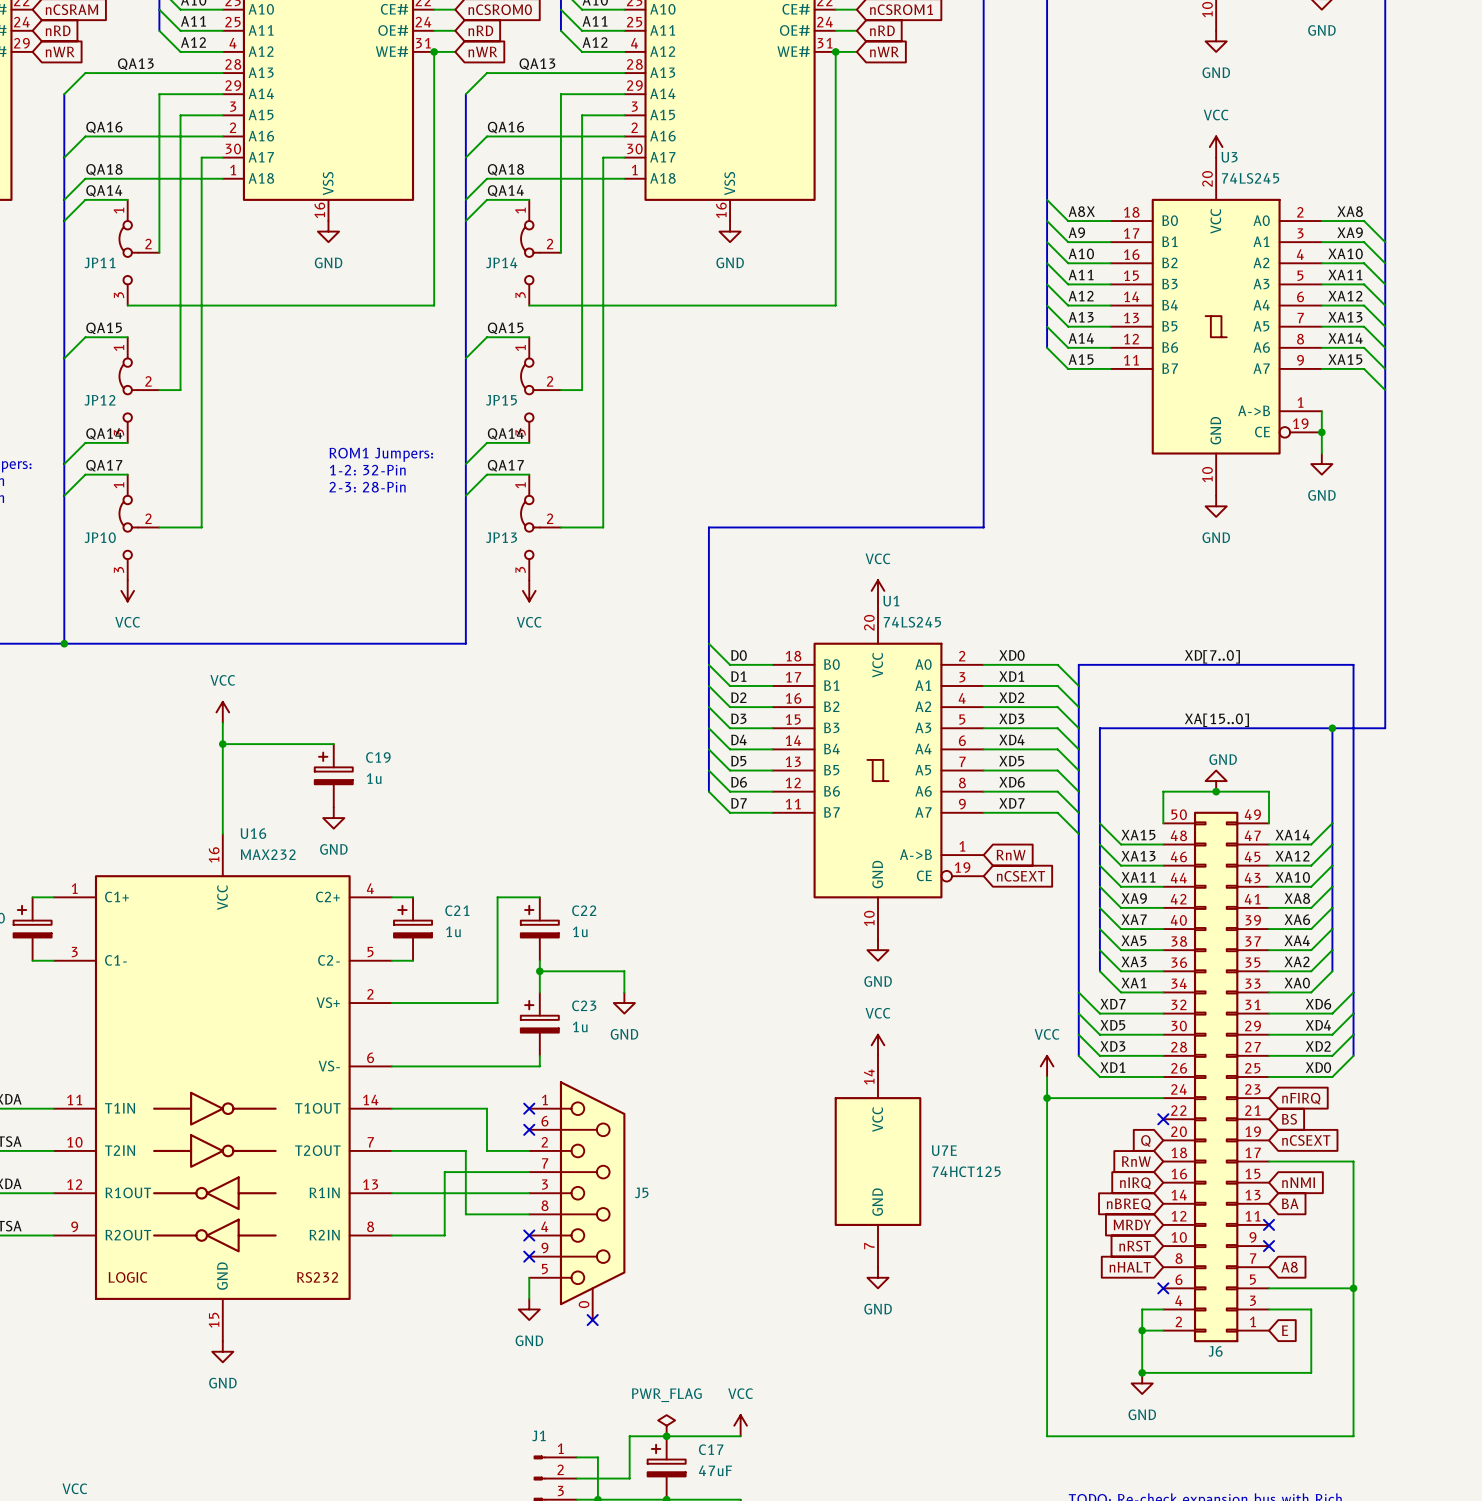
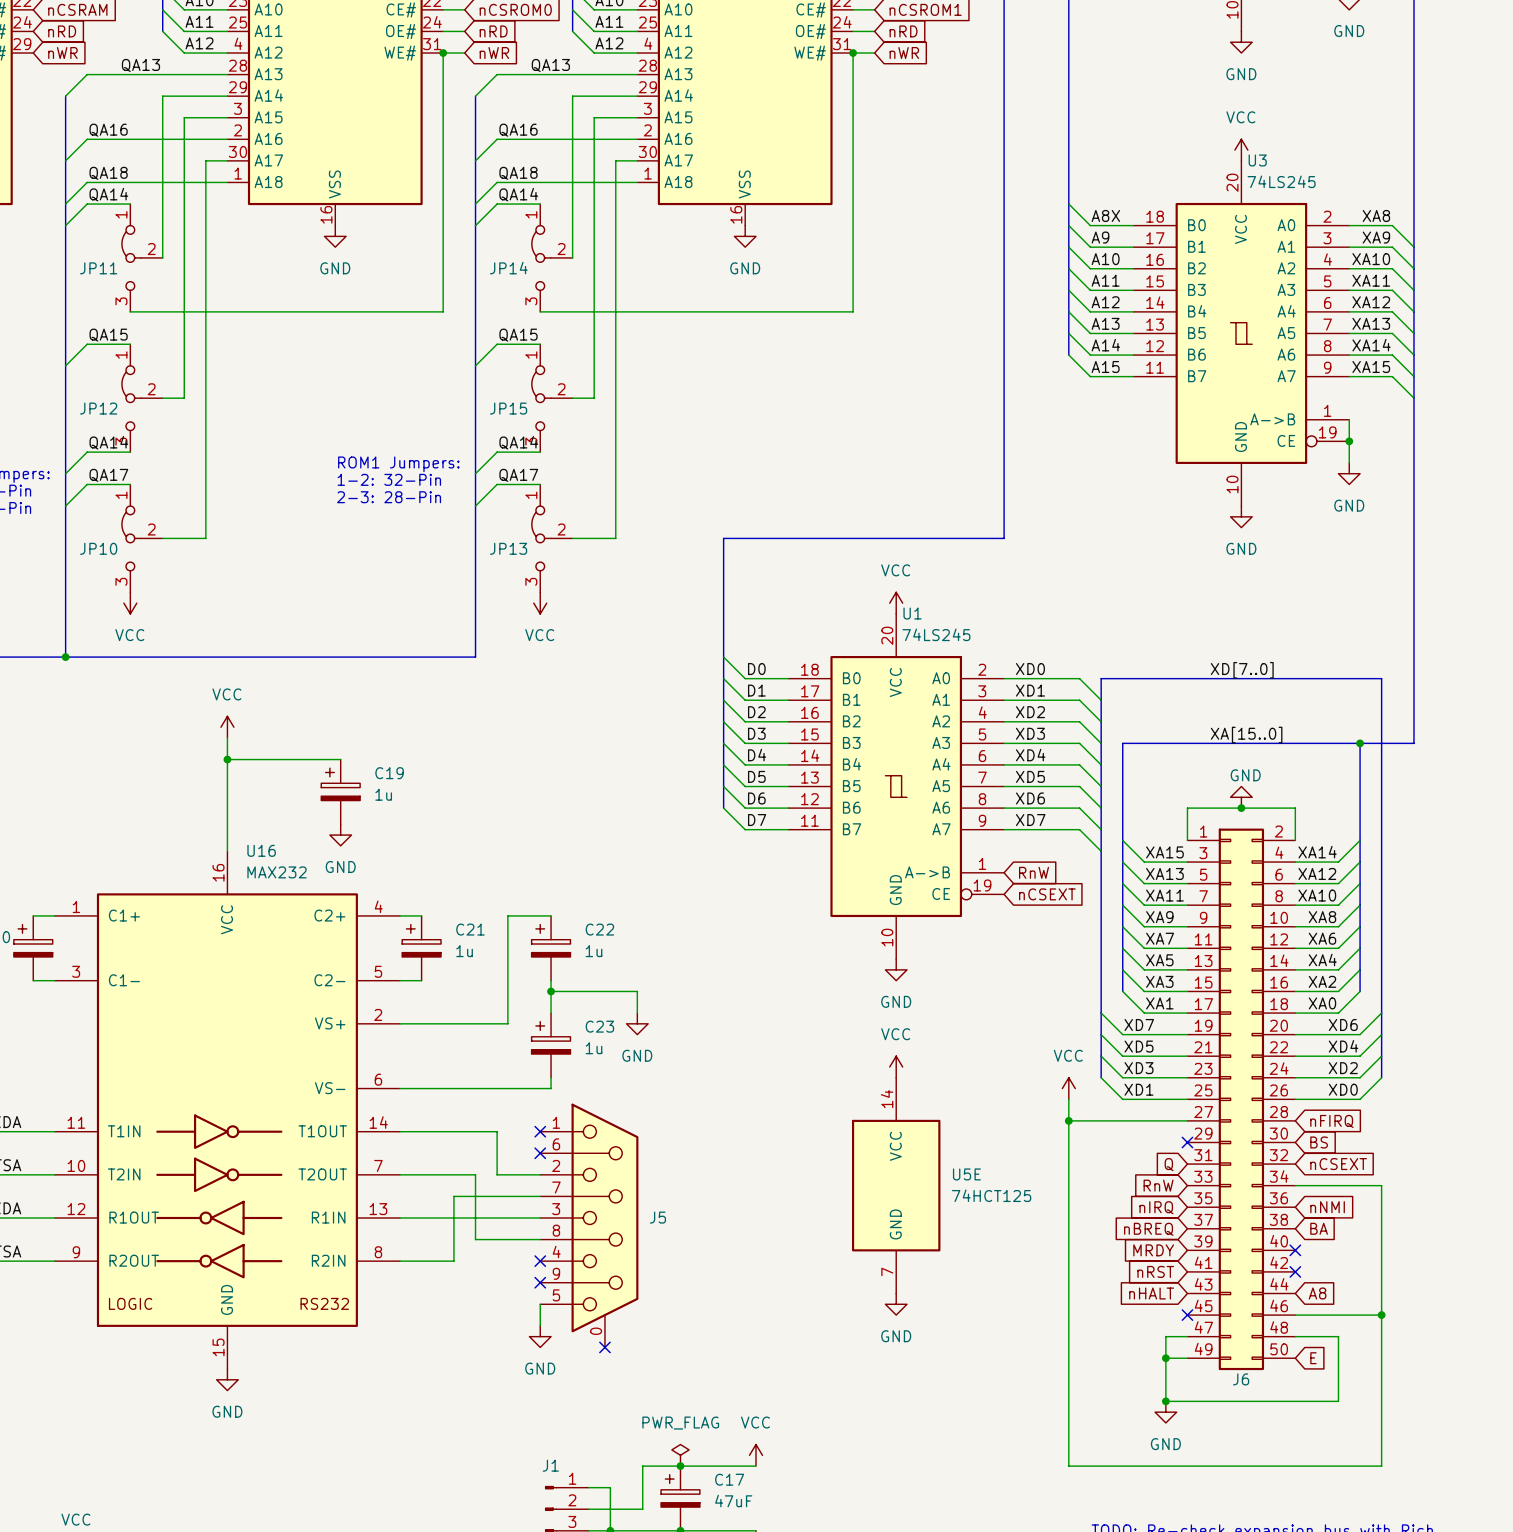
J6 rotation: 0° (1216, 1076) -> 180° (1241, 1099)
U7E name: U7E (944, 1150) -> U5E (966, 1174)

